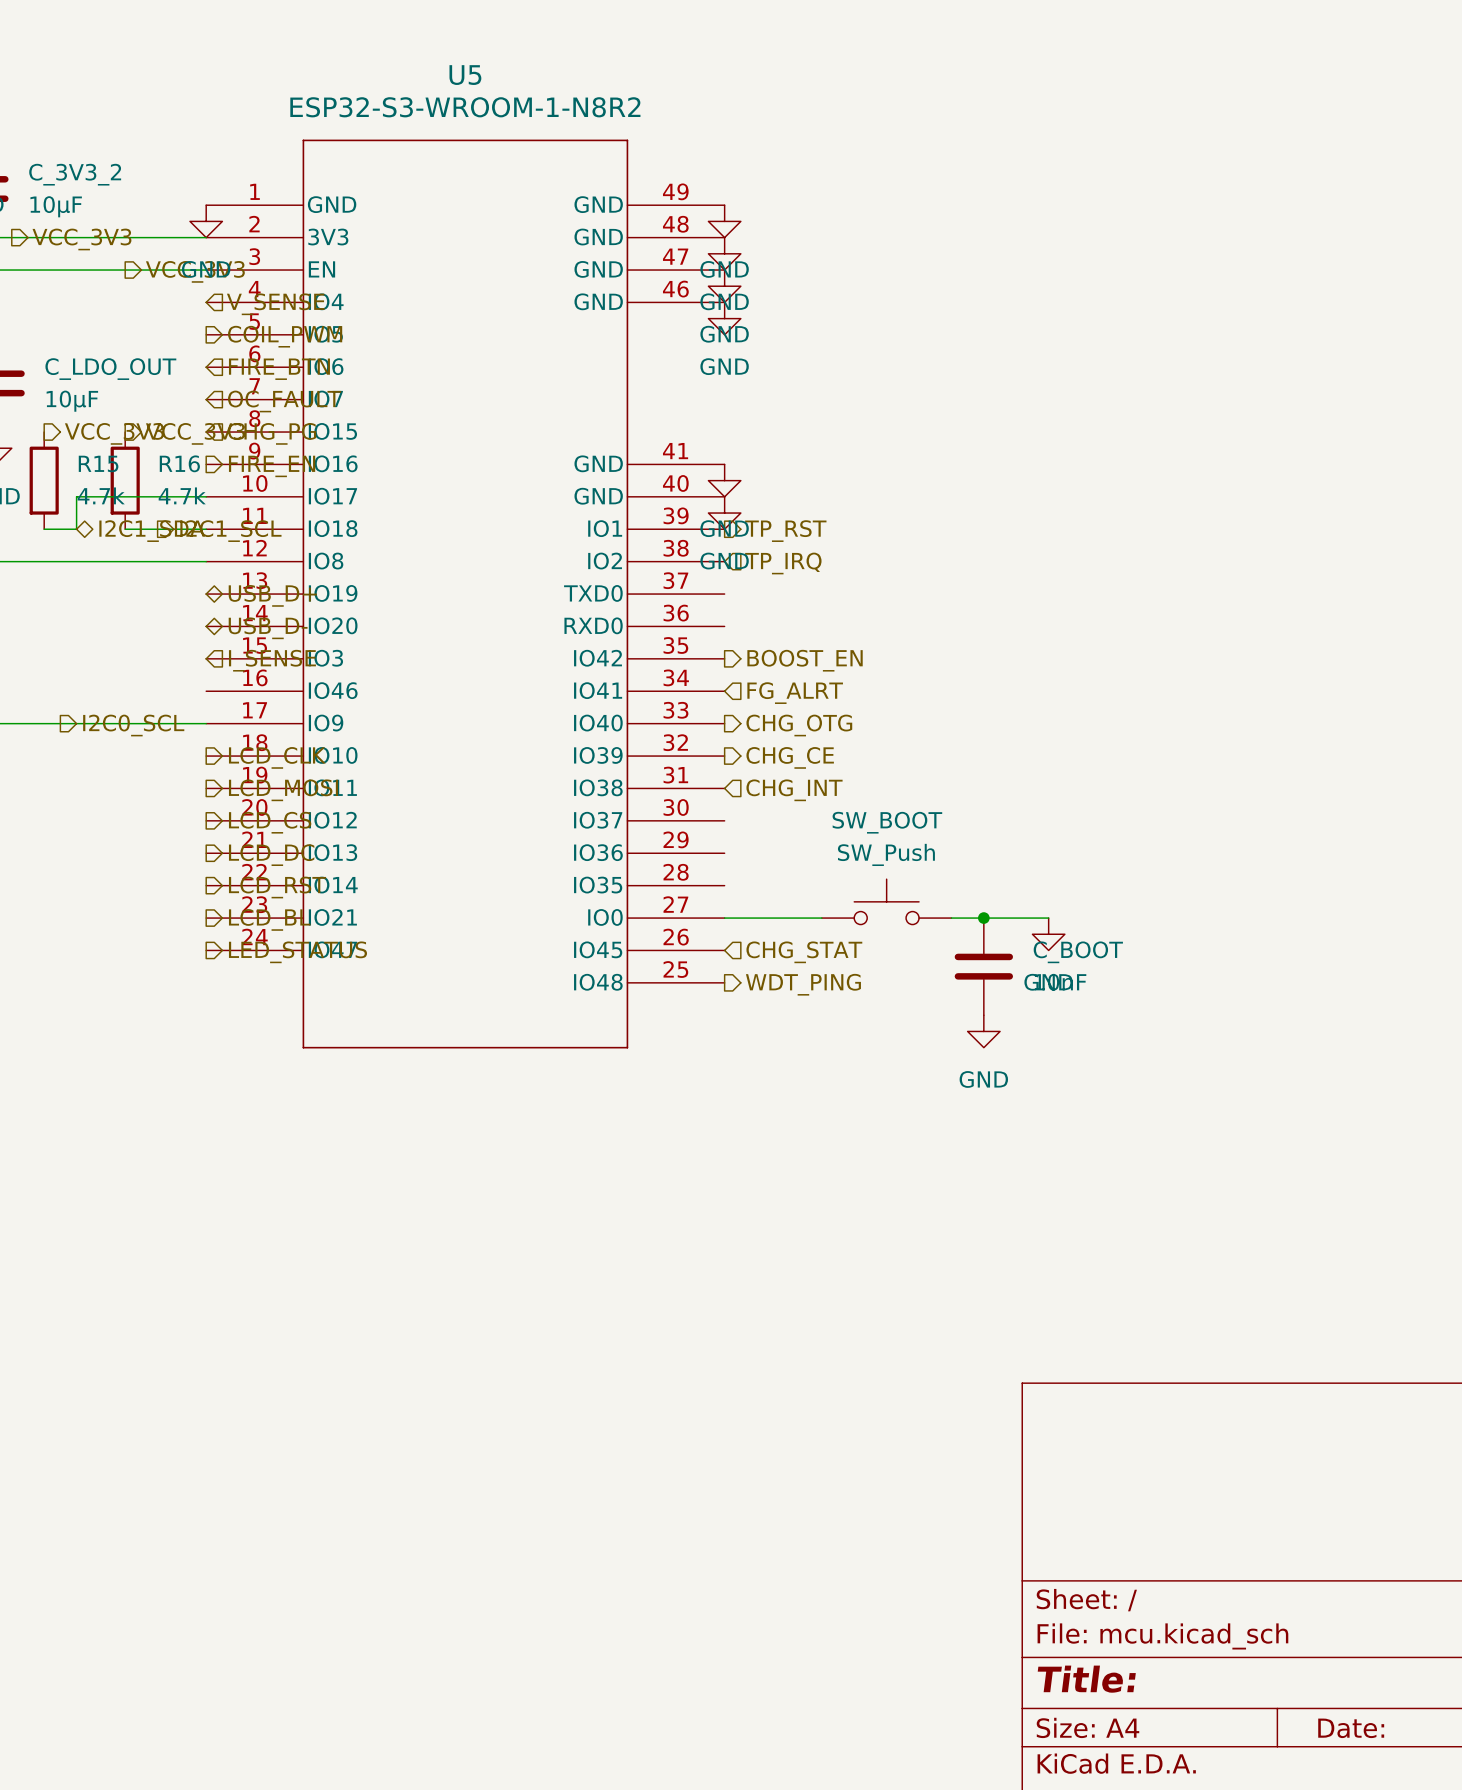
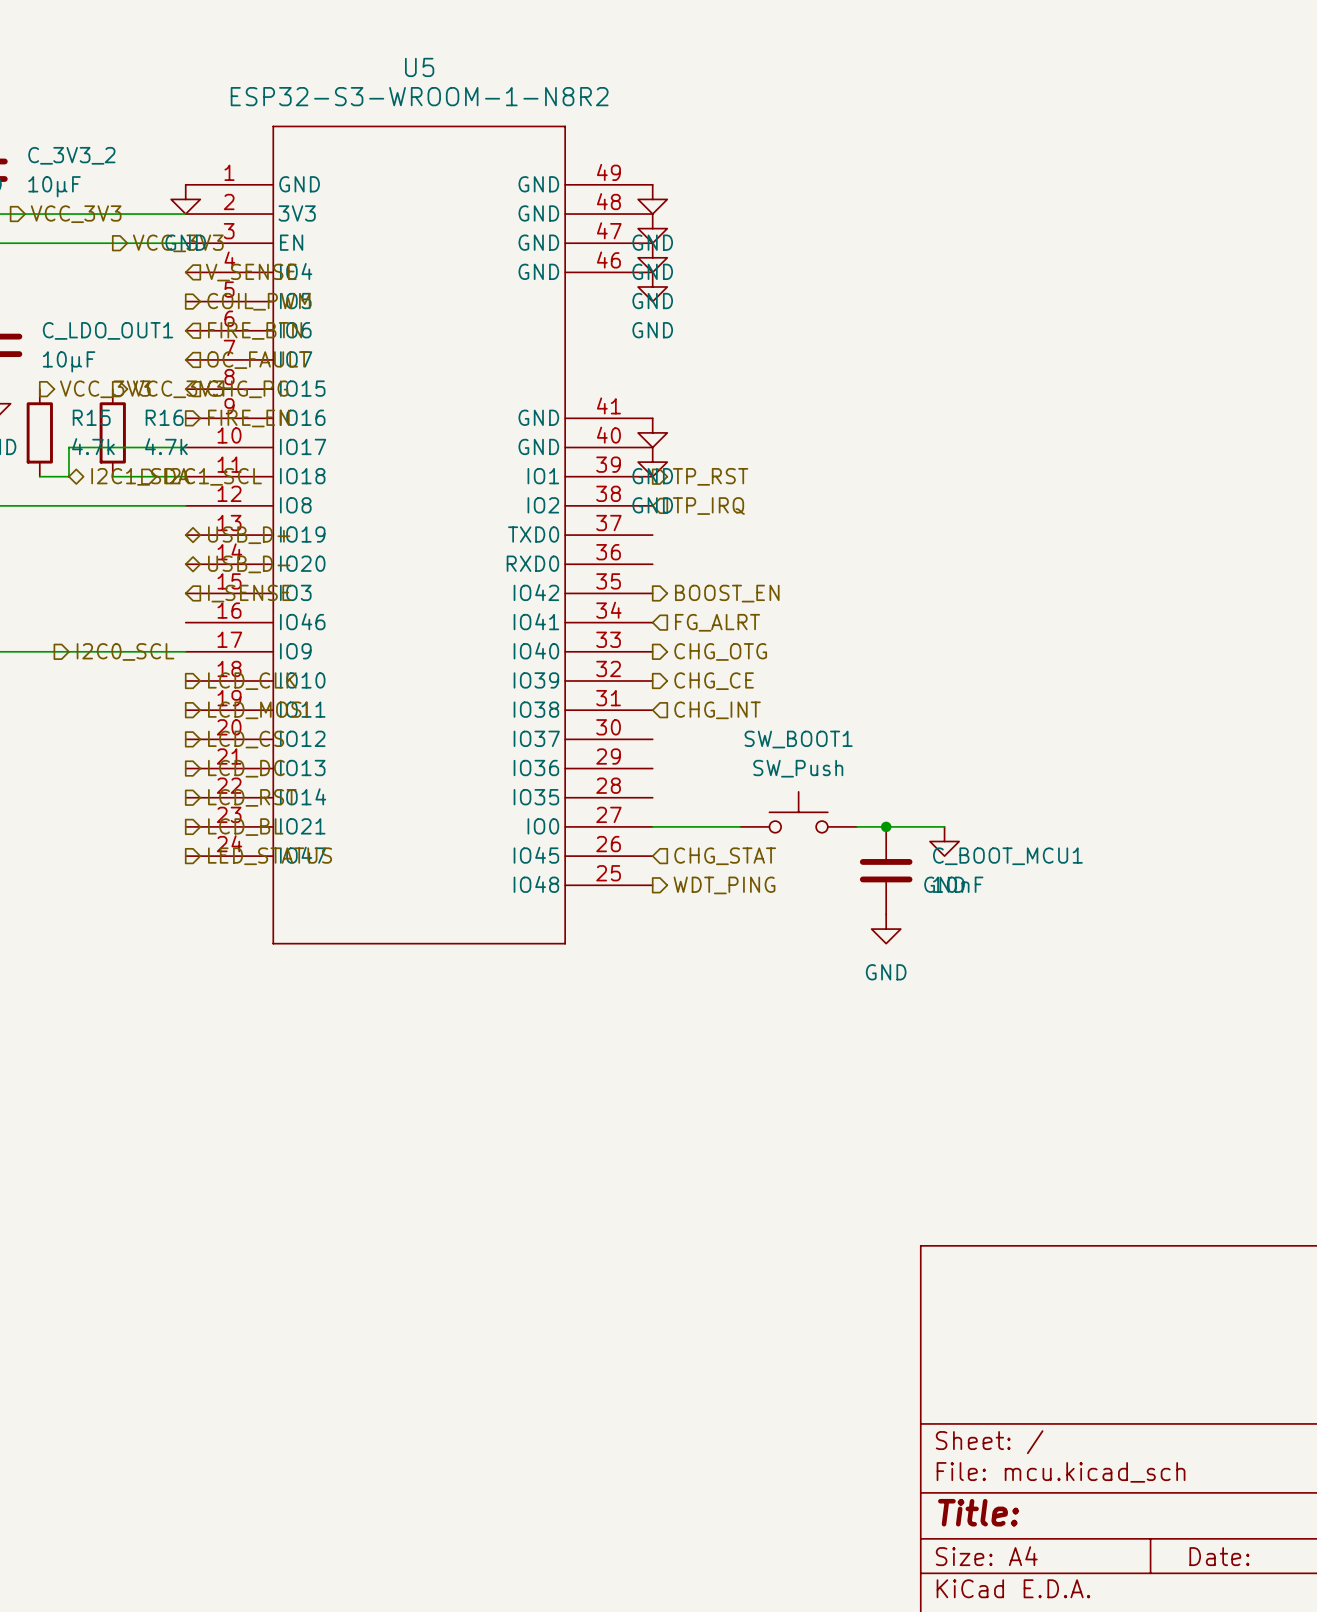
C_LDO_OUT name: C_LDO_OUT (110, 369) -> C_LDO_OUT1 (108, 330)
SW_BOOT name: SW_BOOT (887, 822) -> SW_BOOT1 (798, 739)
C_BOOT name: C_BOOT (1078, 952) -> C_BOOT_MCU1 (1007, 856)

